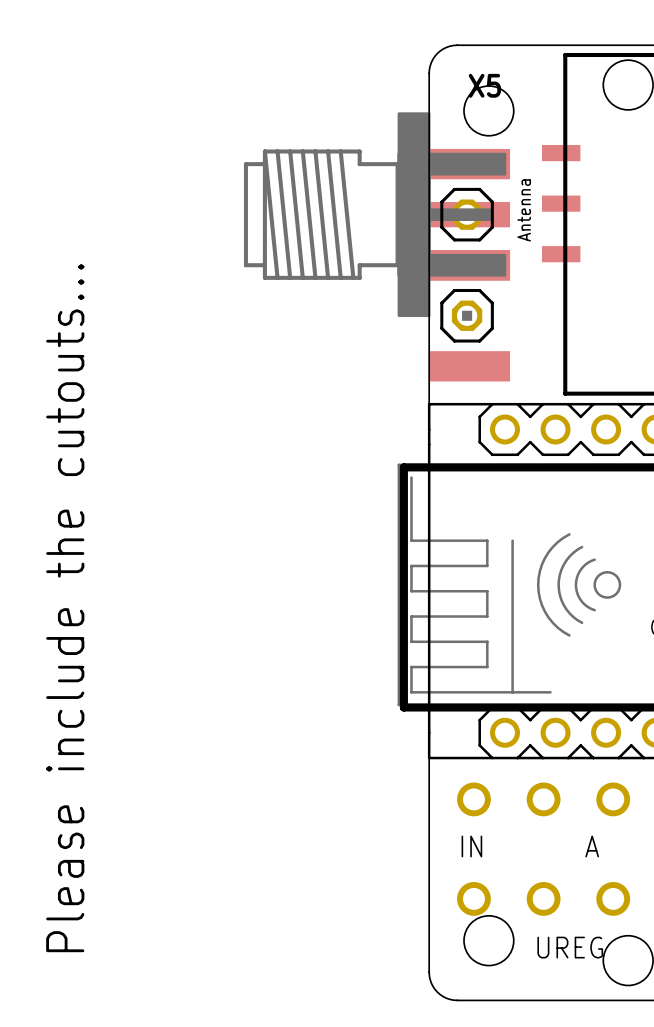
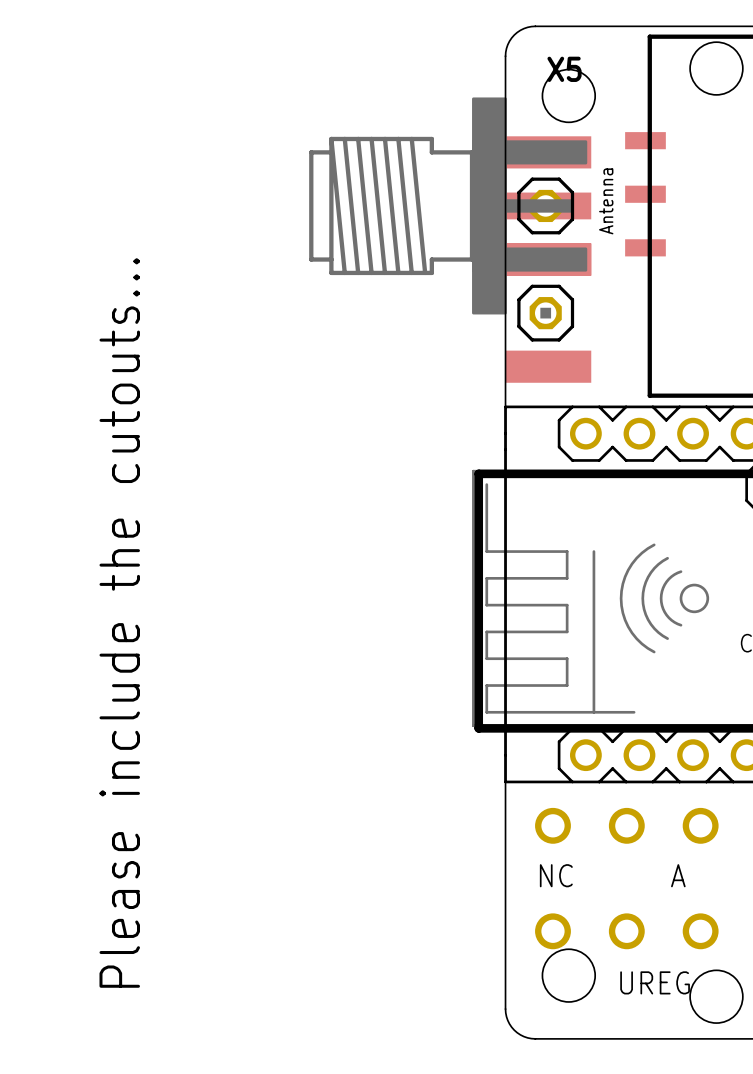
text: IN (471, 846) -> NC (556, 875)

